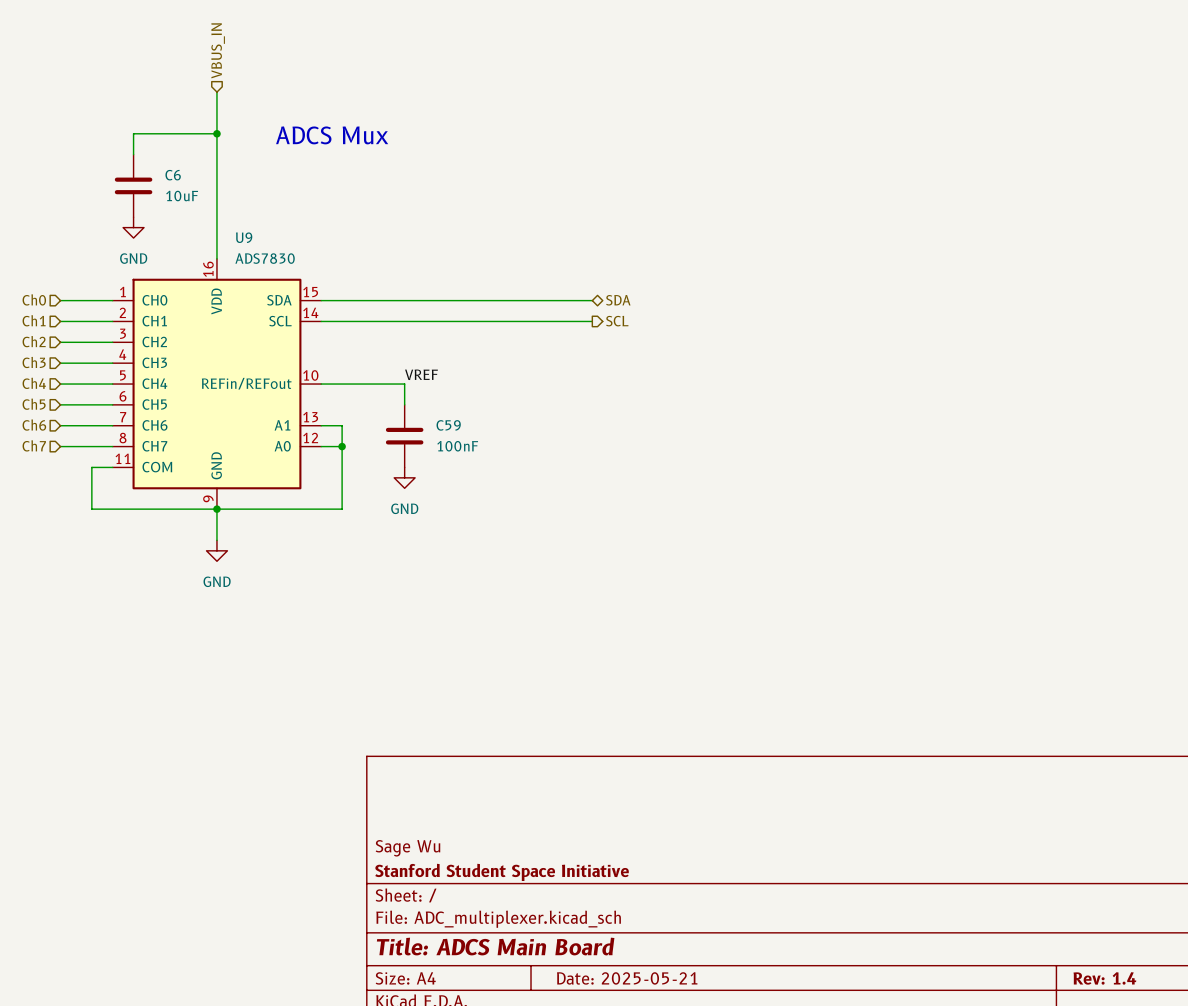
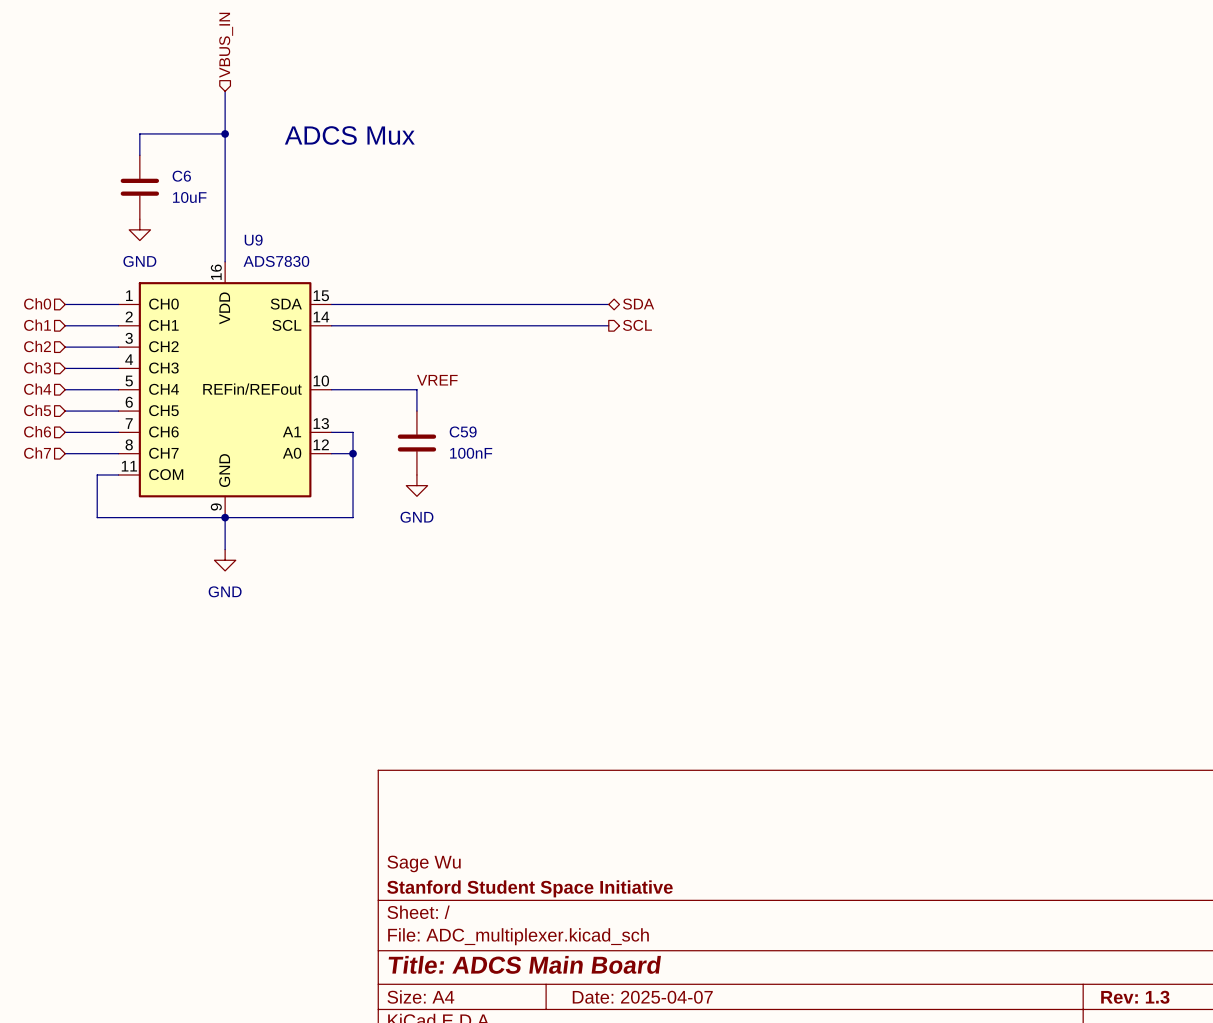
title block: Date: 2025-05-21 (627, 978) -> Date: 2025-04-07 (642, 997)
title block: Rev: 1.4 (1104, 978) -> Rev: 1.3 (1135, 997)

